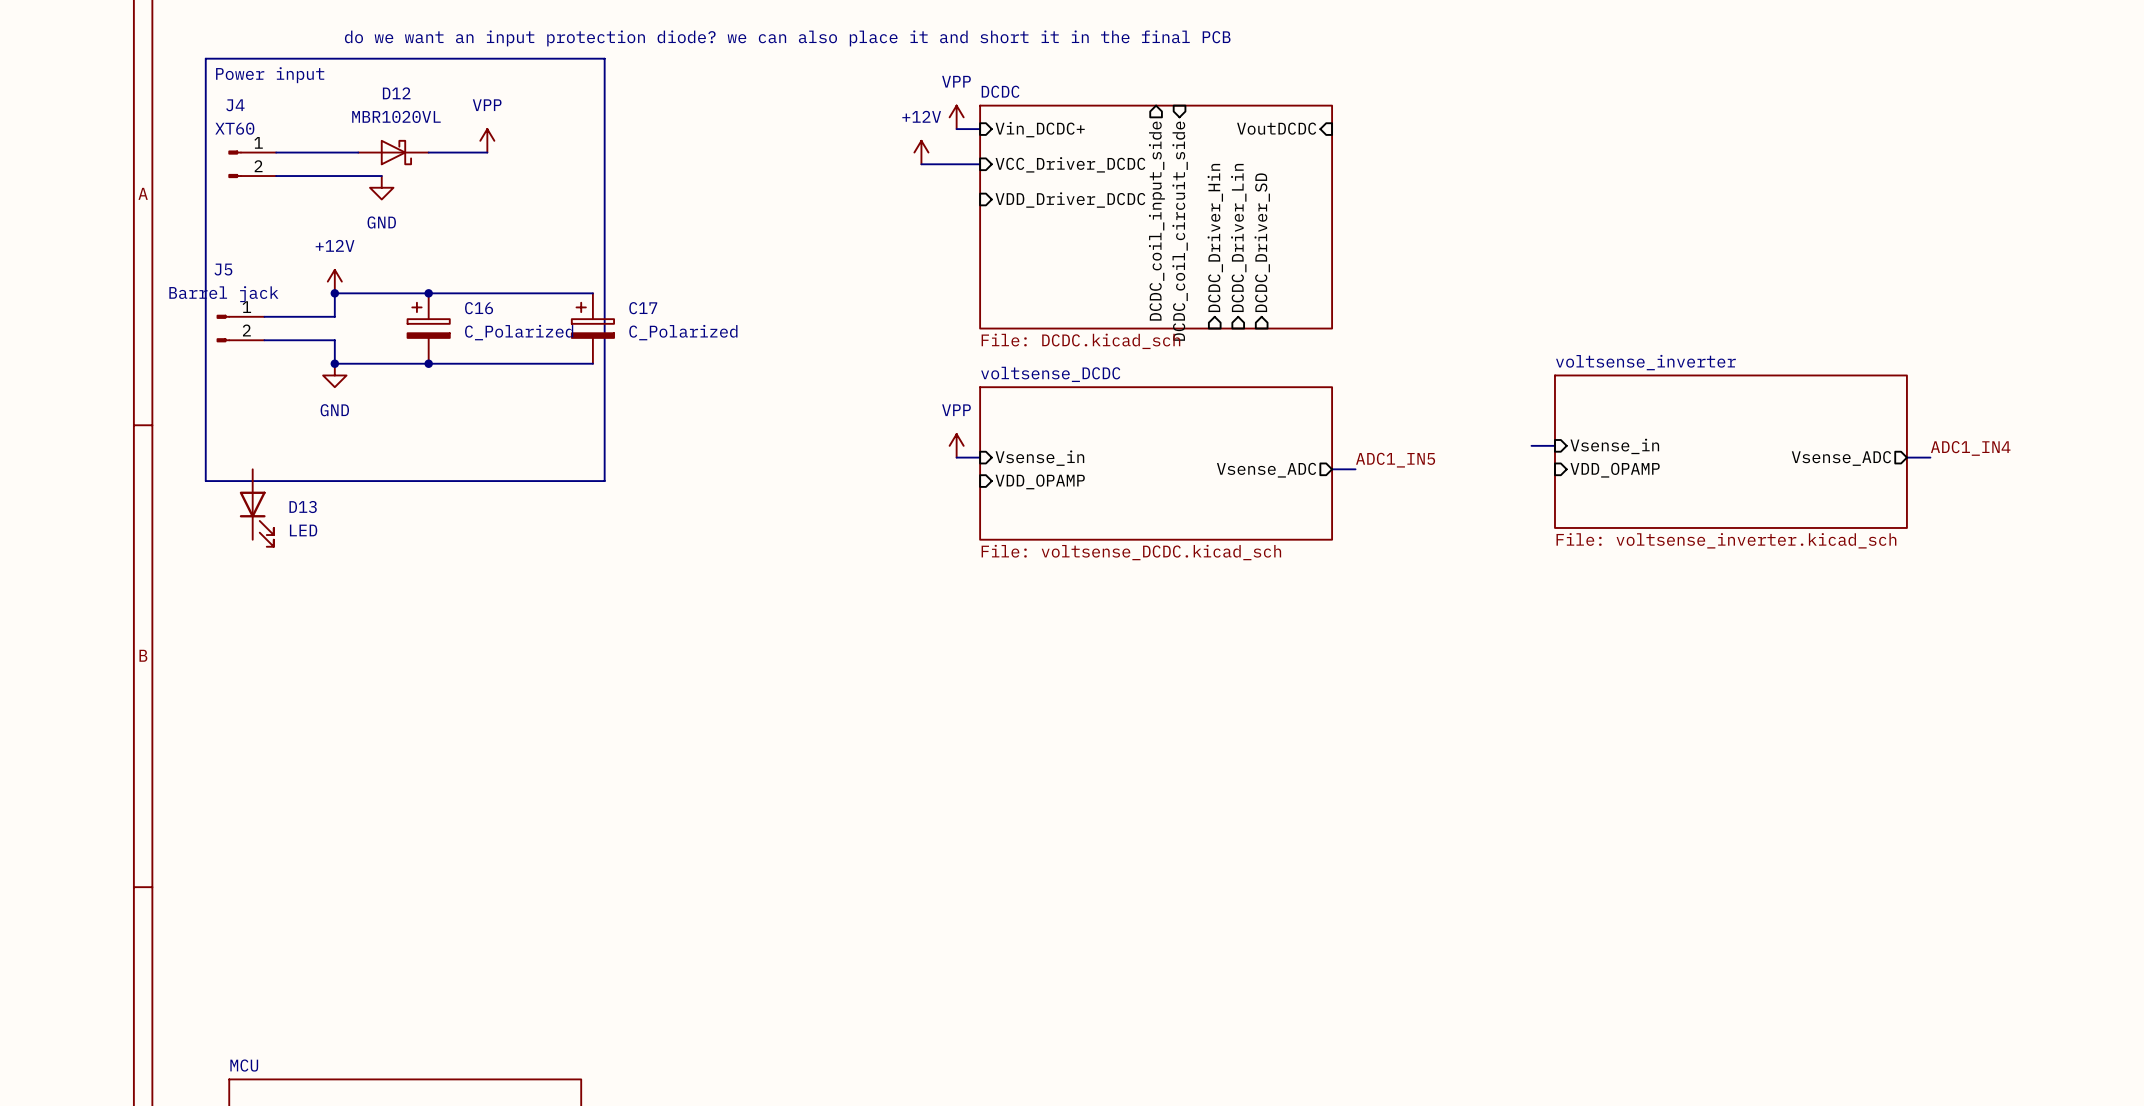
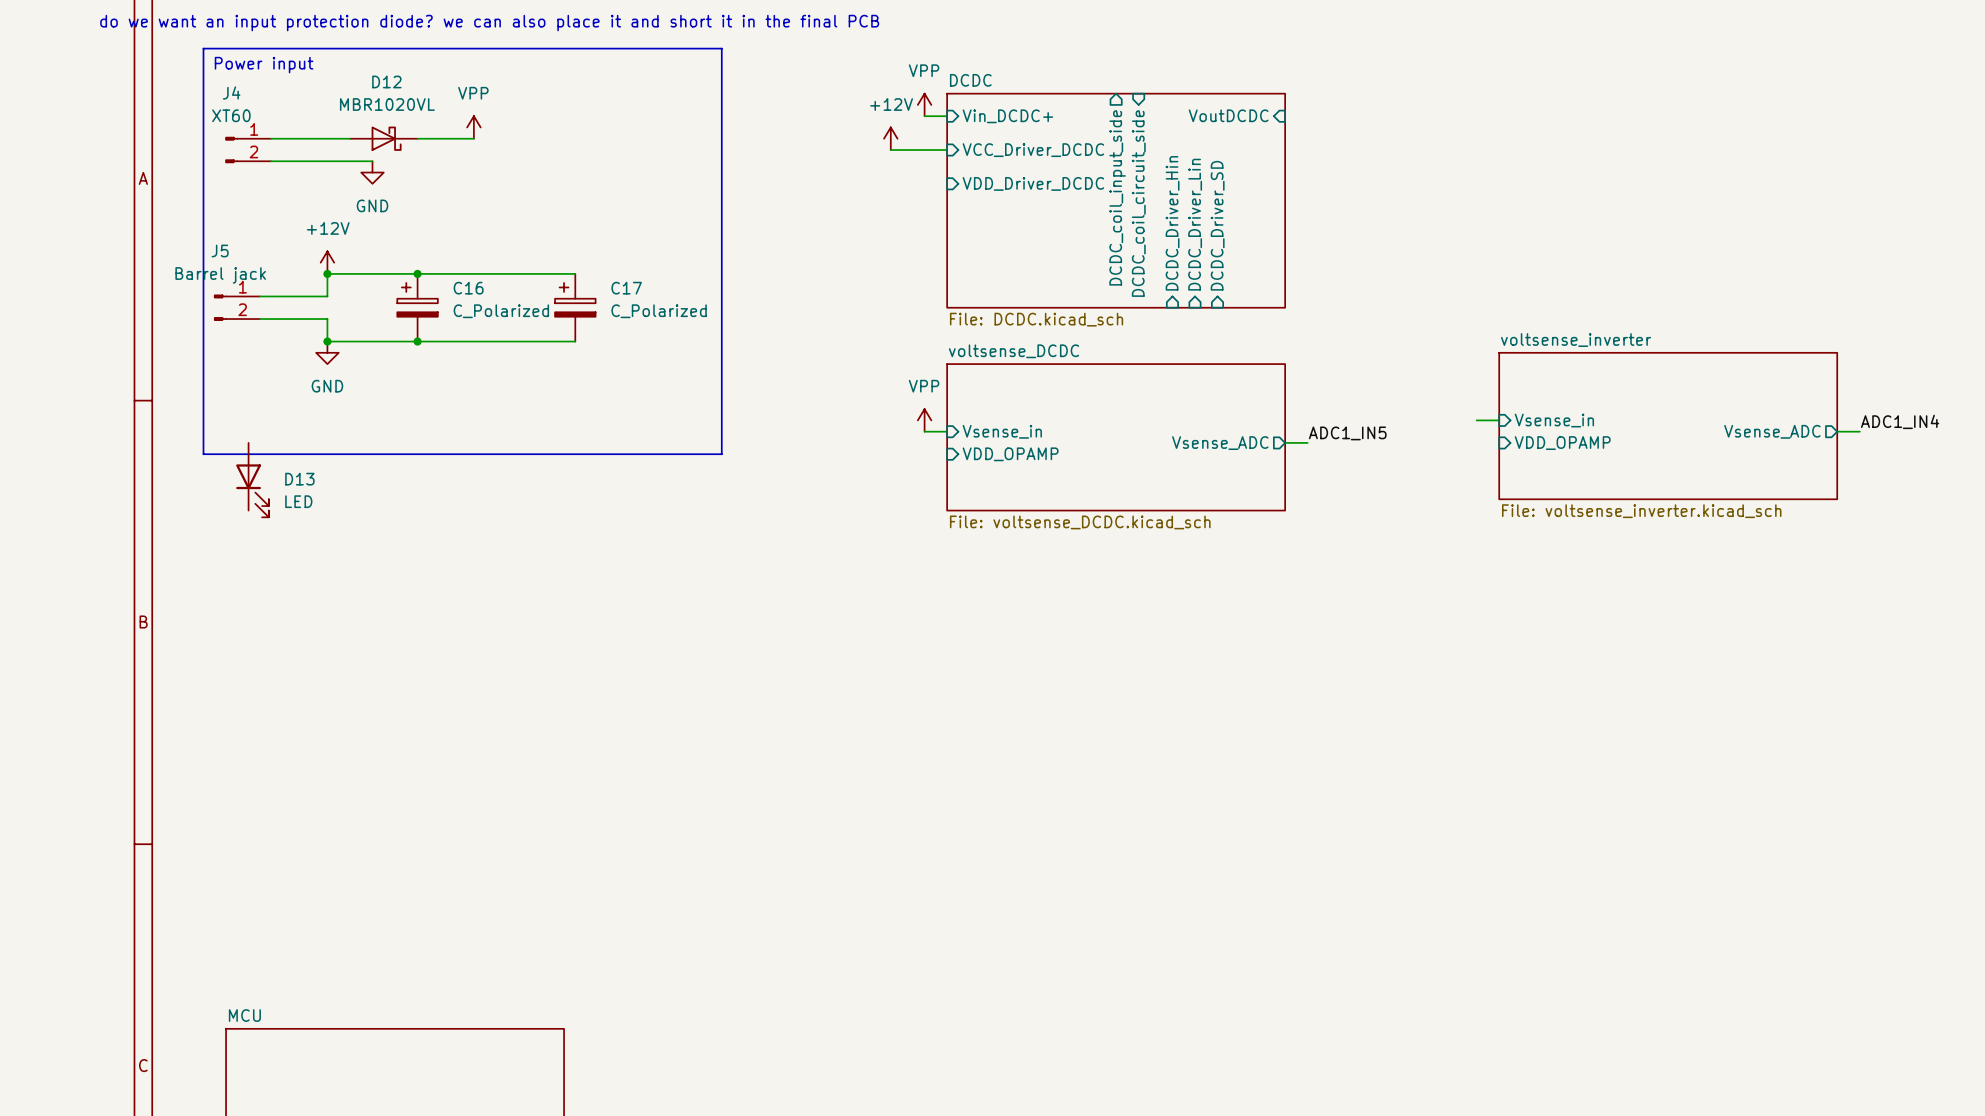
text: none -> do we want an input protection diode? we can also place it and short it in the final PCB (489, 23)
text: do we want an input protection diode? we can also place it and short it in the final PCB (787, 38) -> none
line: (604, 58) (604, 481) -> (586, 48) (721, 48) (721, 454) (586, 454)

